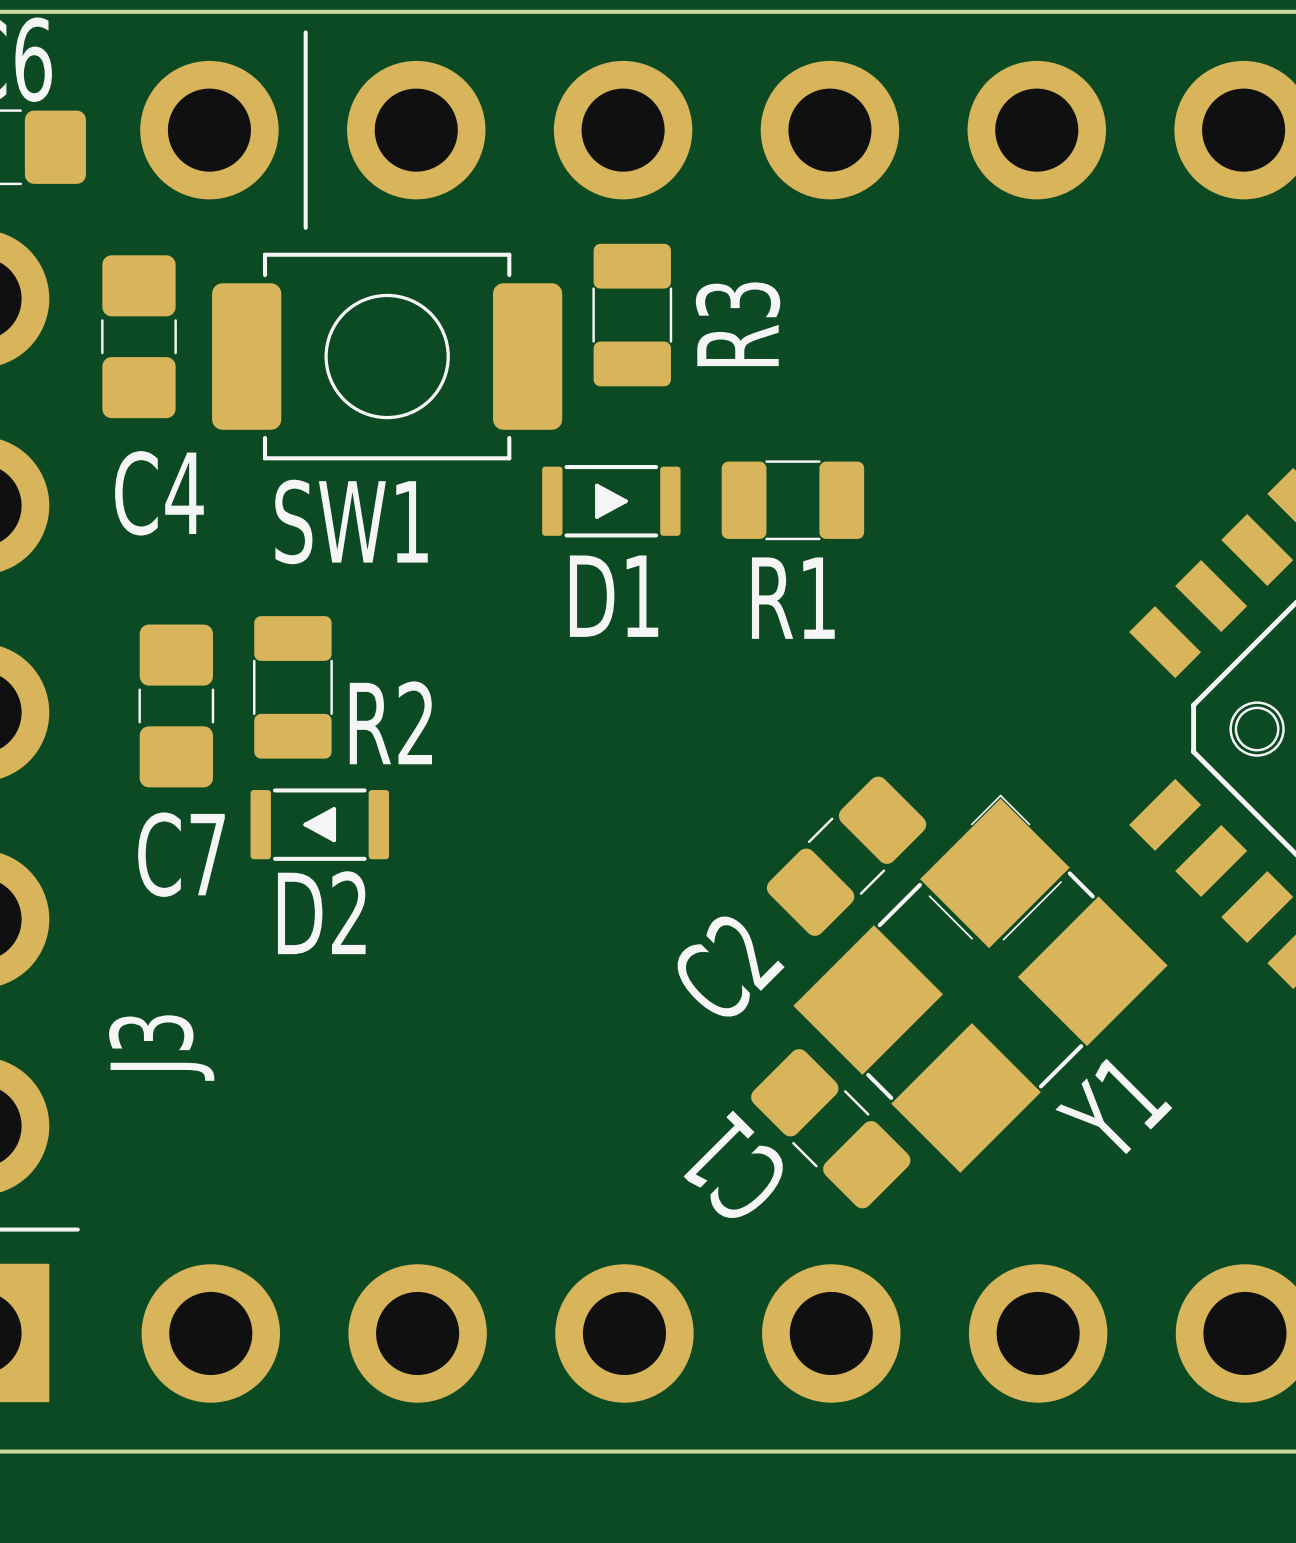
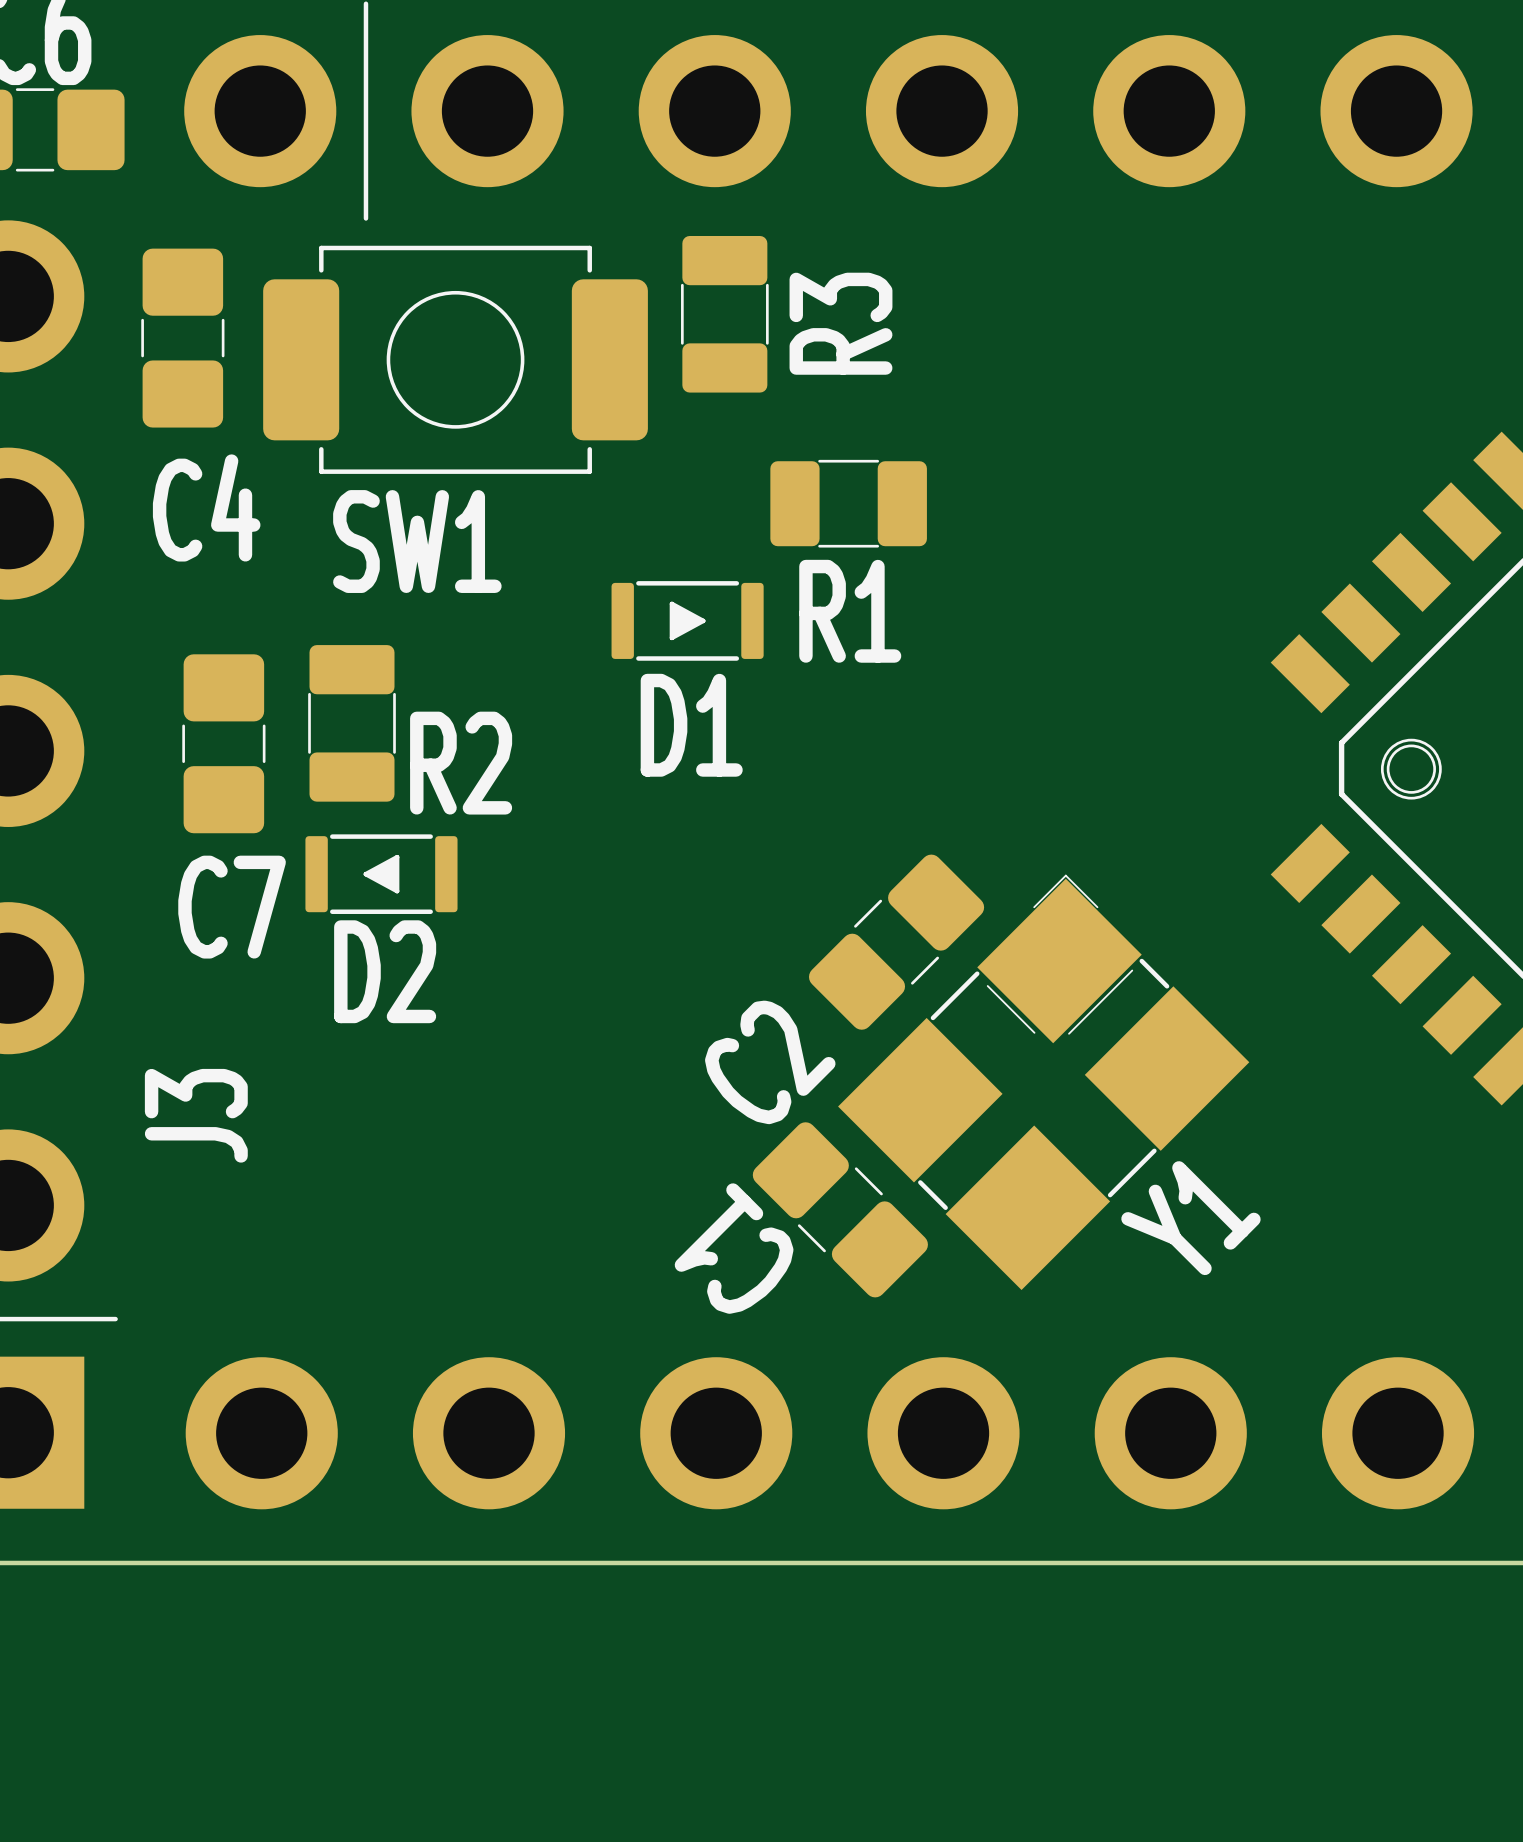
R1 position: (792, 500) -> (848, 503)
D1 position: (611, 501) -> (687, 620)
C2 position: (846, 856) -> (896, 942)
Y1 position: (980, 983) -> (1043, 1082)
C1 position: (830, 1128) -> (840, 1209)

